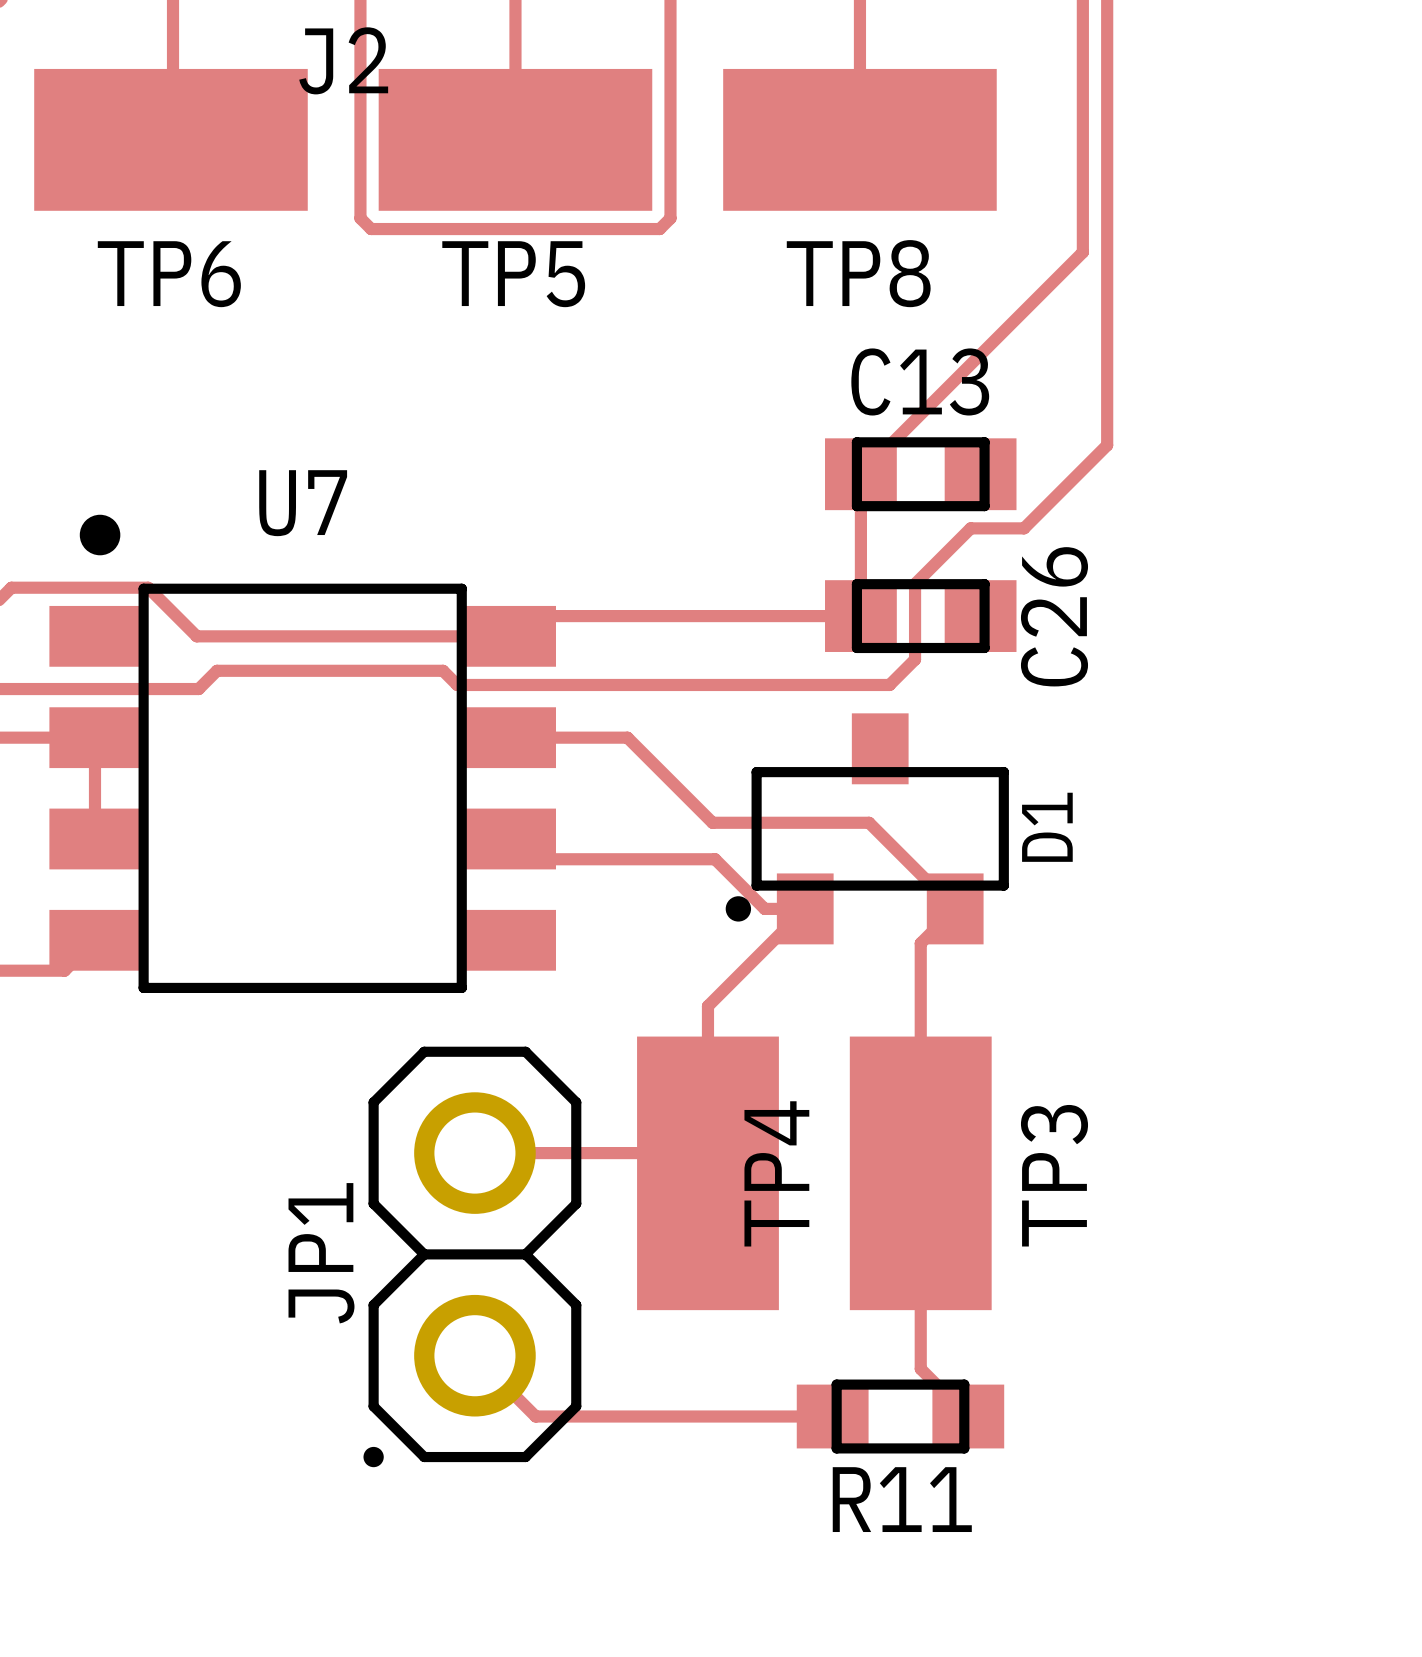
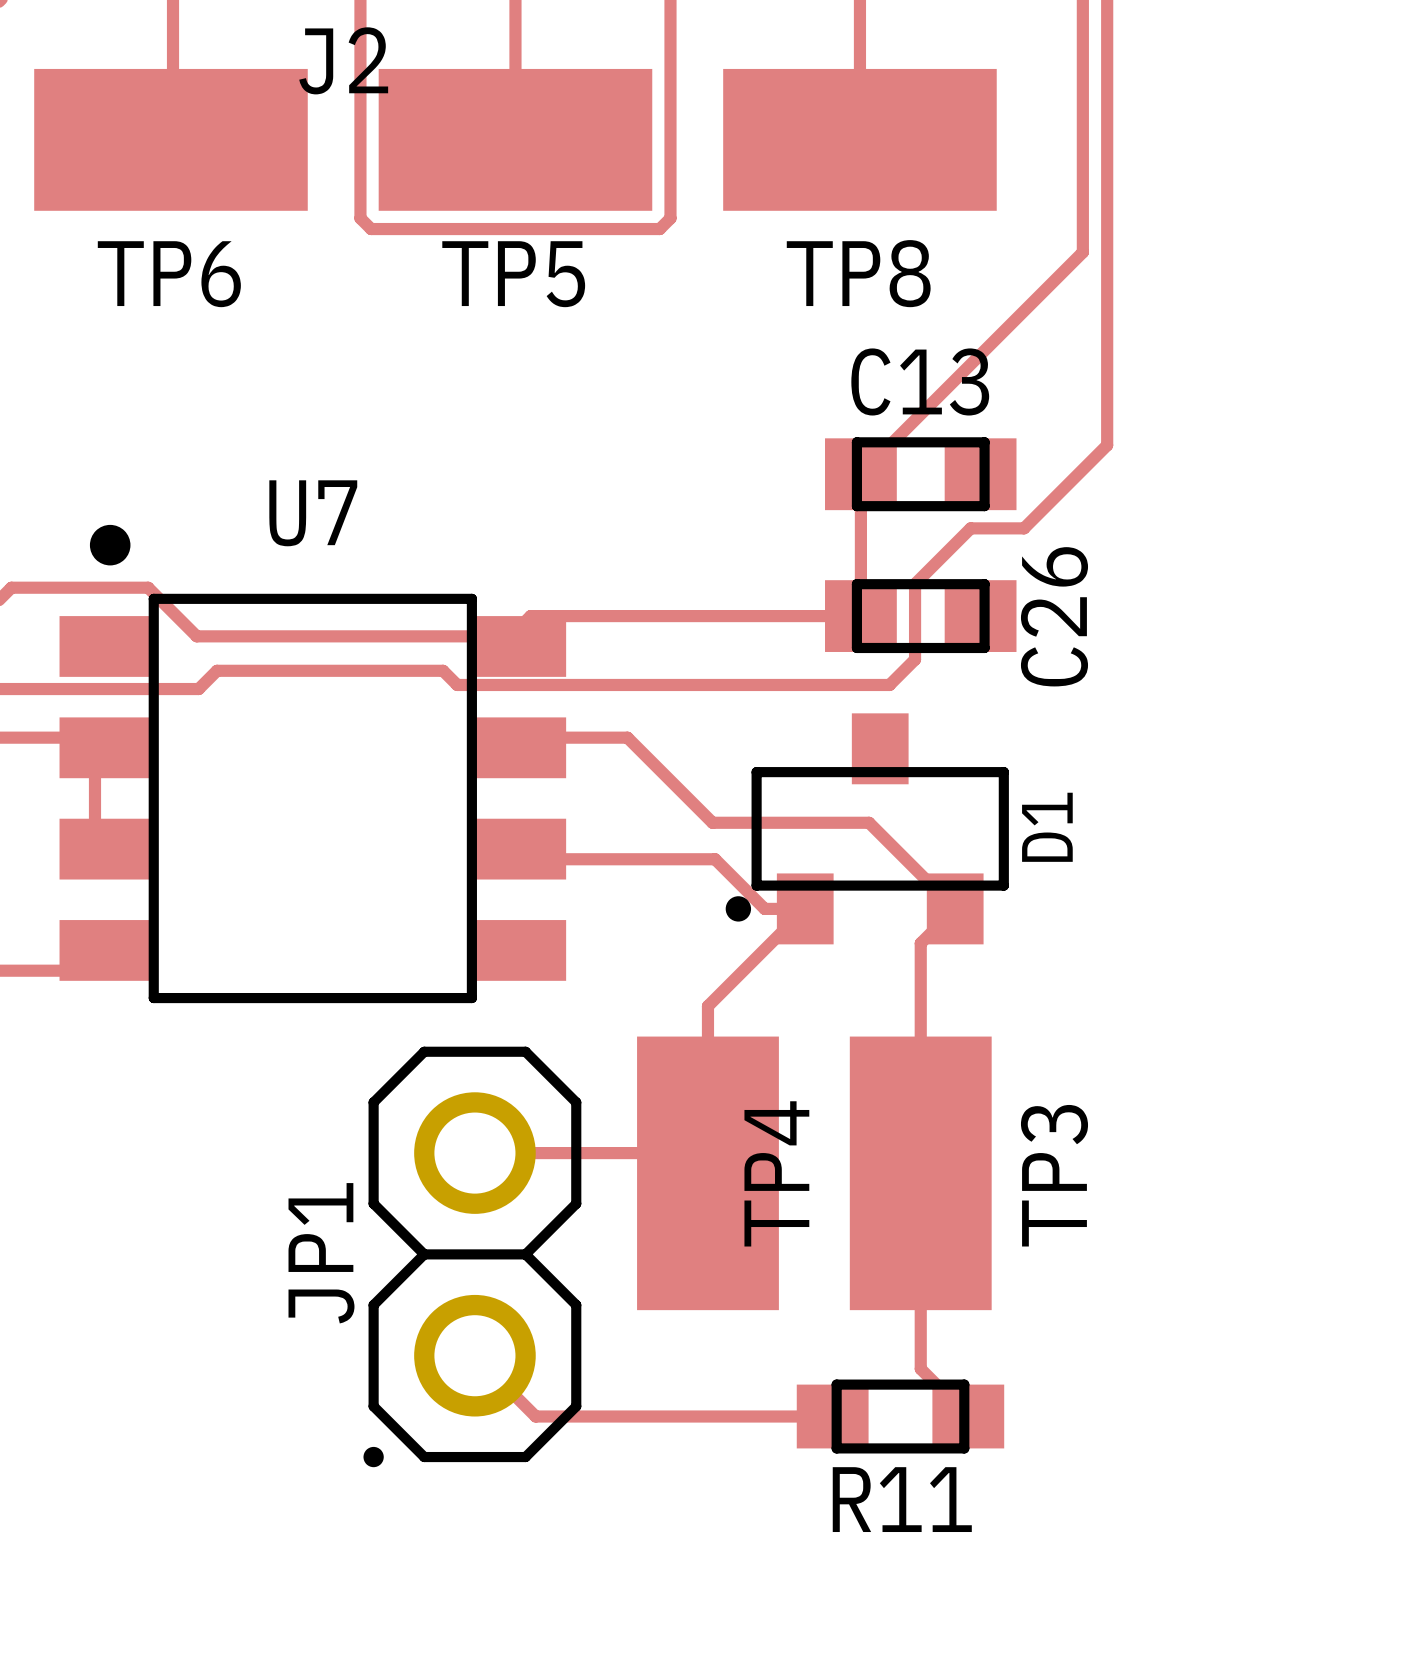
U7 position: (302, 753) -> (312, 764)

